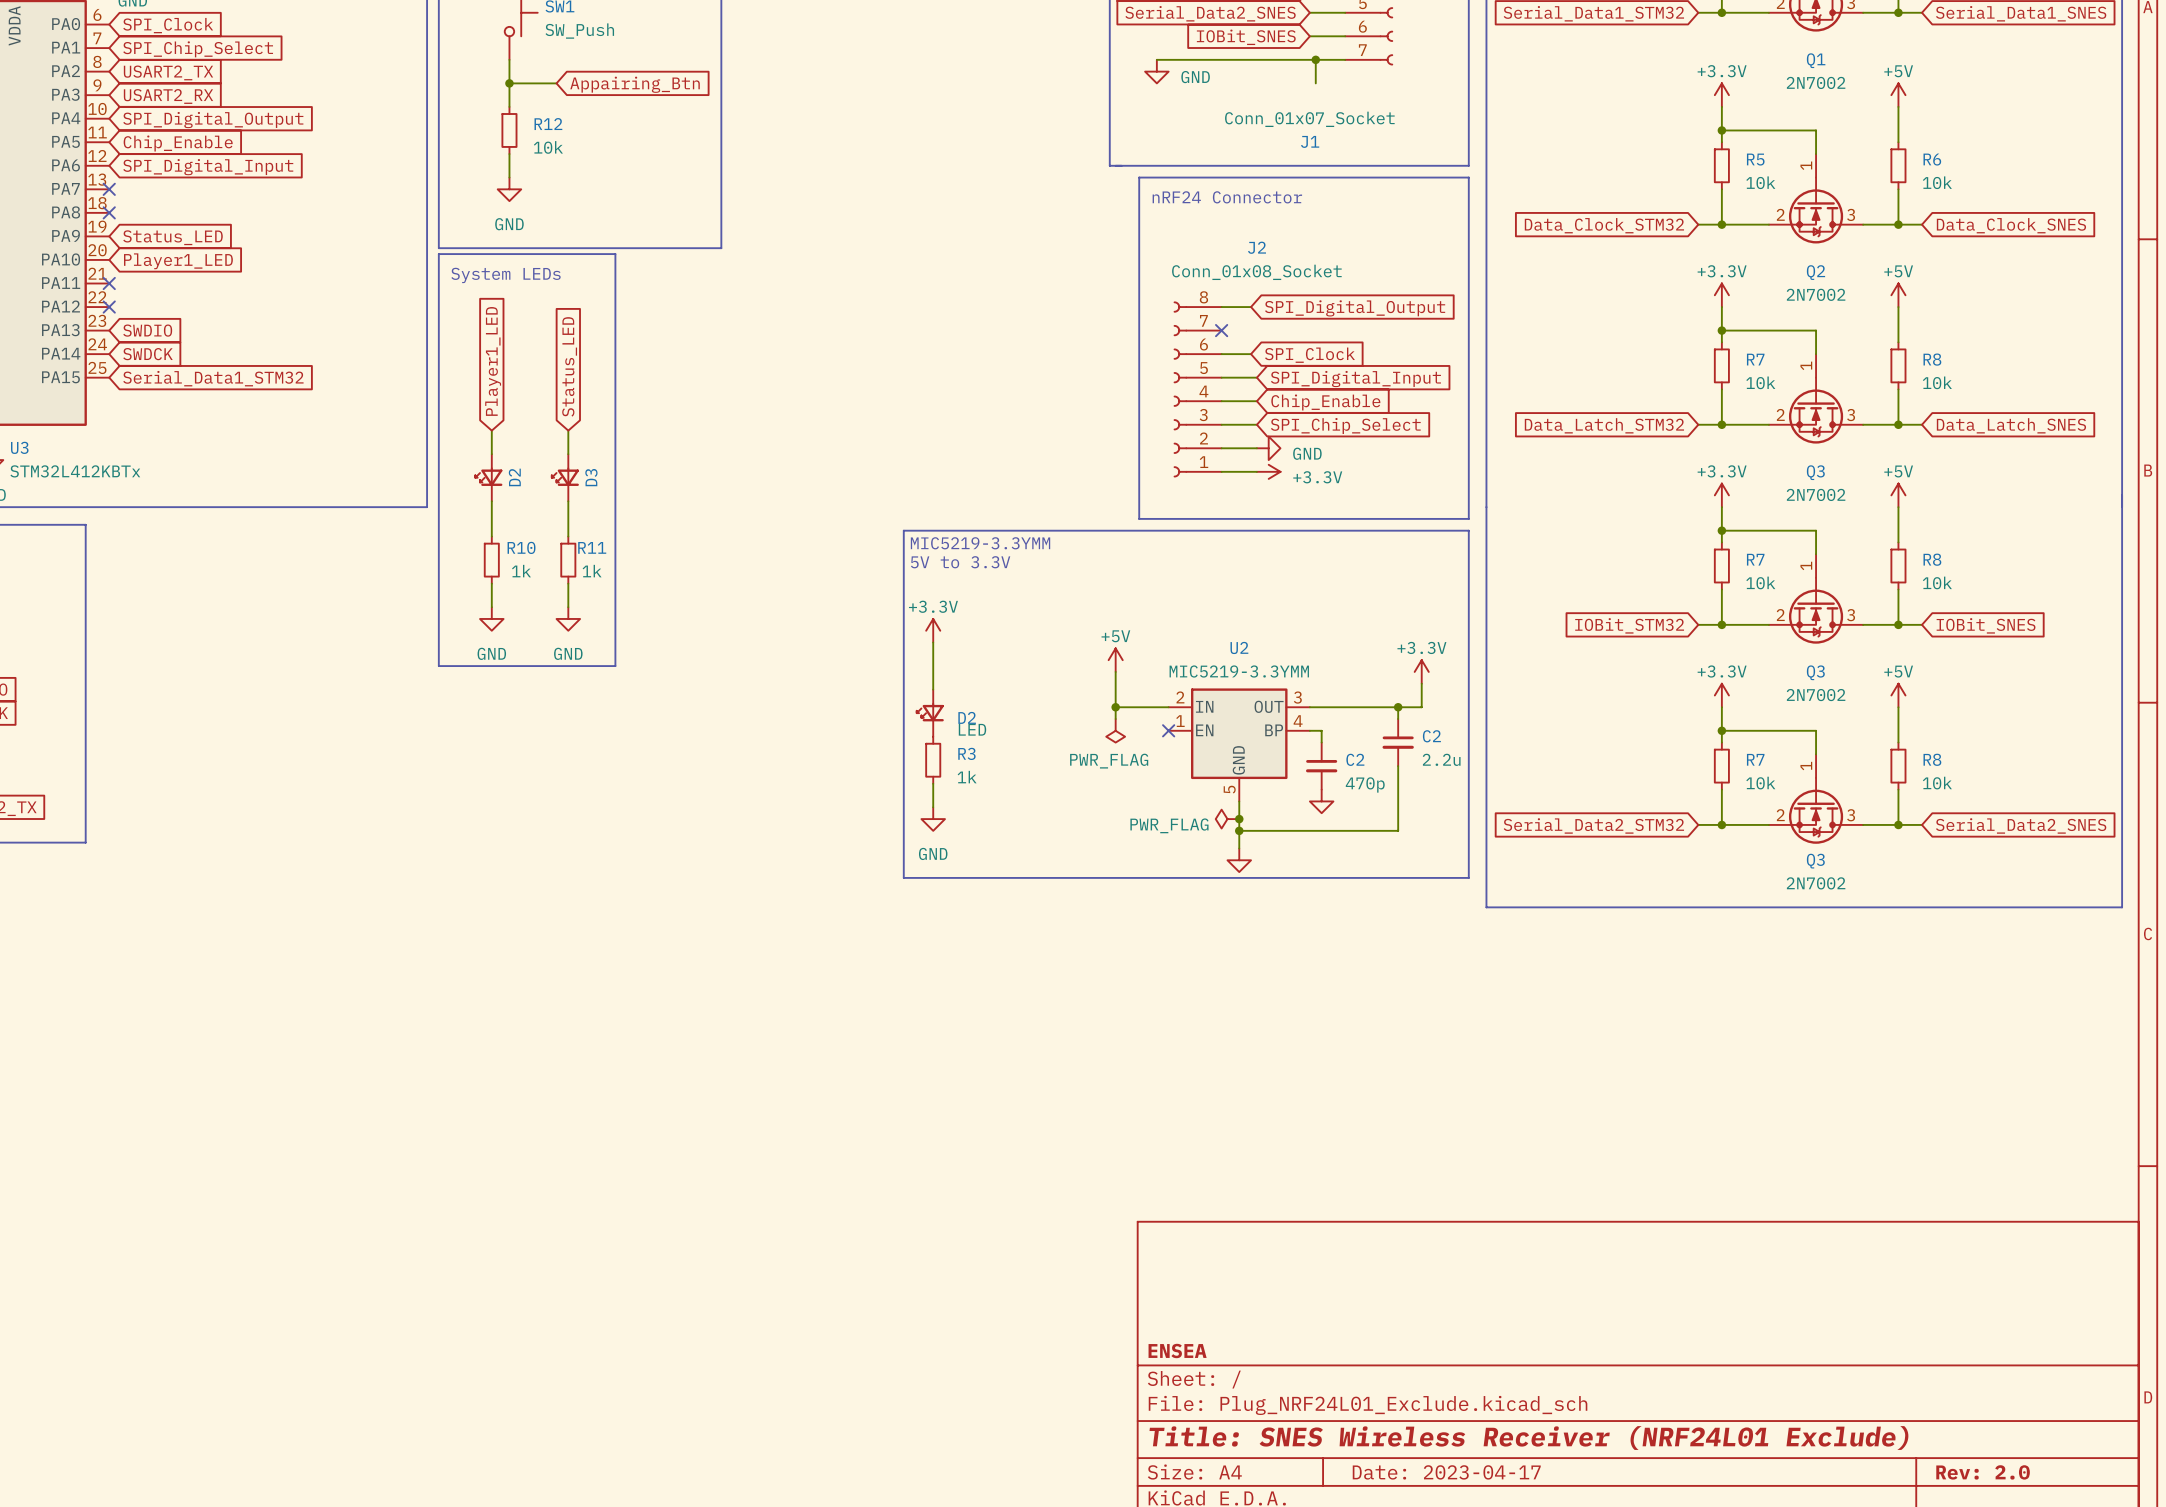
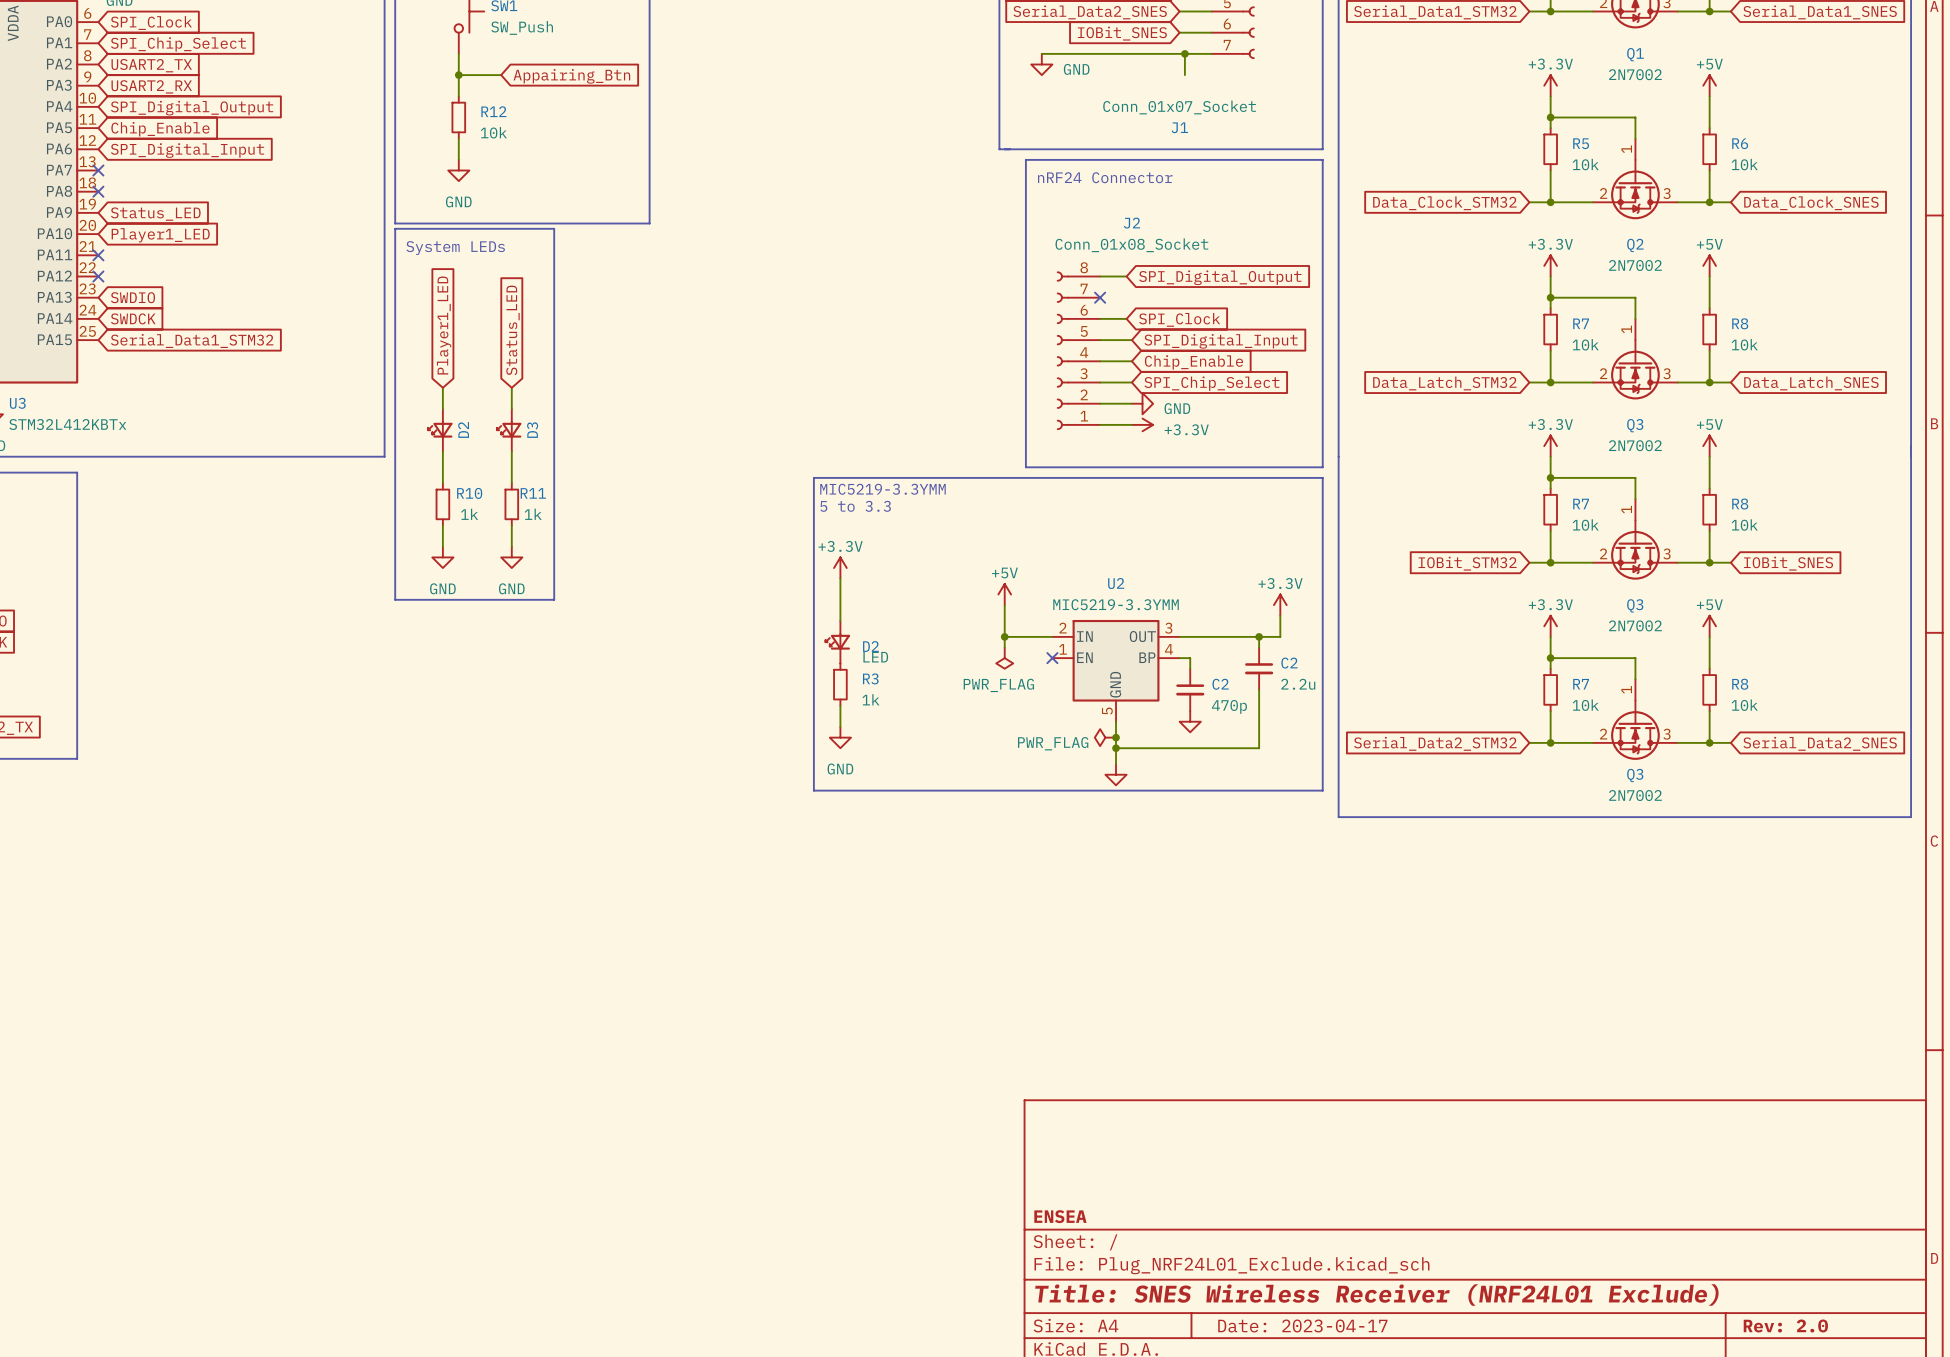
text: 5V to 3.3V (960, 562) -> 5 to 3.3 (855, 506)

